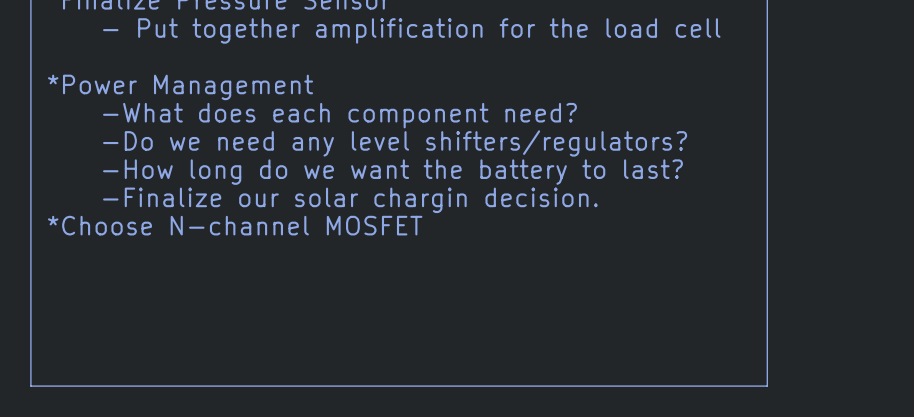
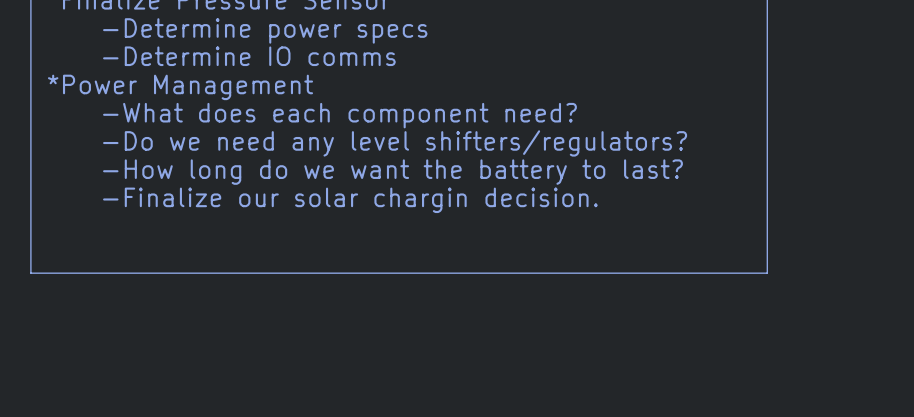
text: - Put together amplification for the load cell (411, 30) -> -Determine power specs (265, 30)
text: none -> -Determine IO comms (249, 56)
text: *Choose N-channel MOSFET (235, 225) -> none
line: (30, 273) (30, 386) (767, 386) (767, 273) -> (30, 273) (767, 273)

